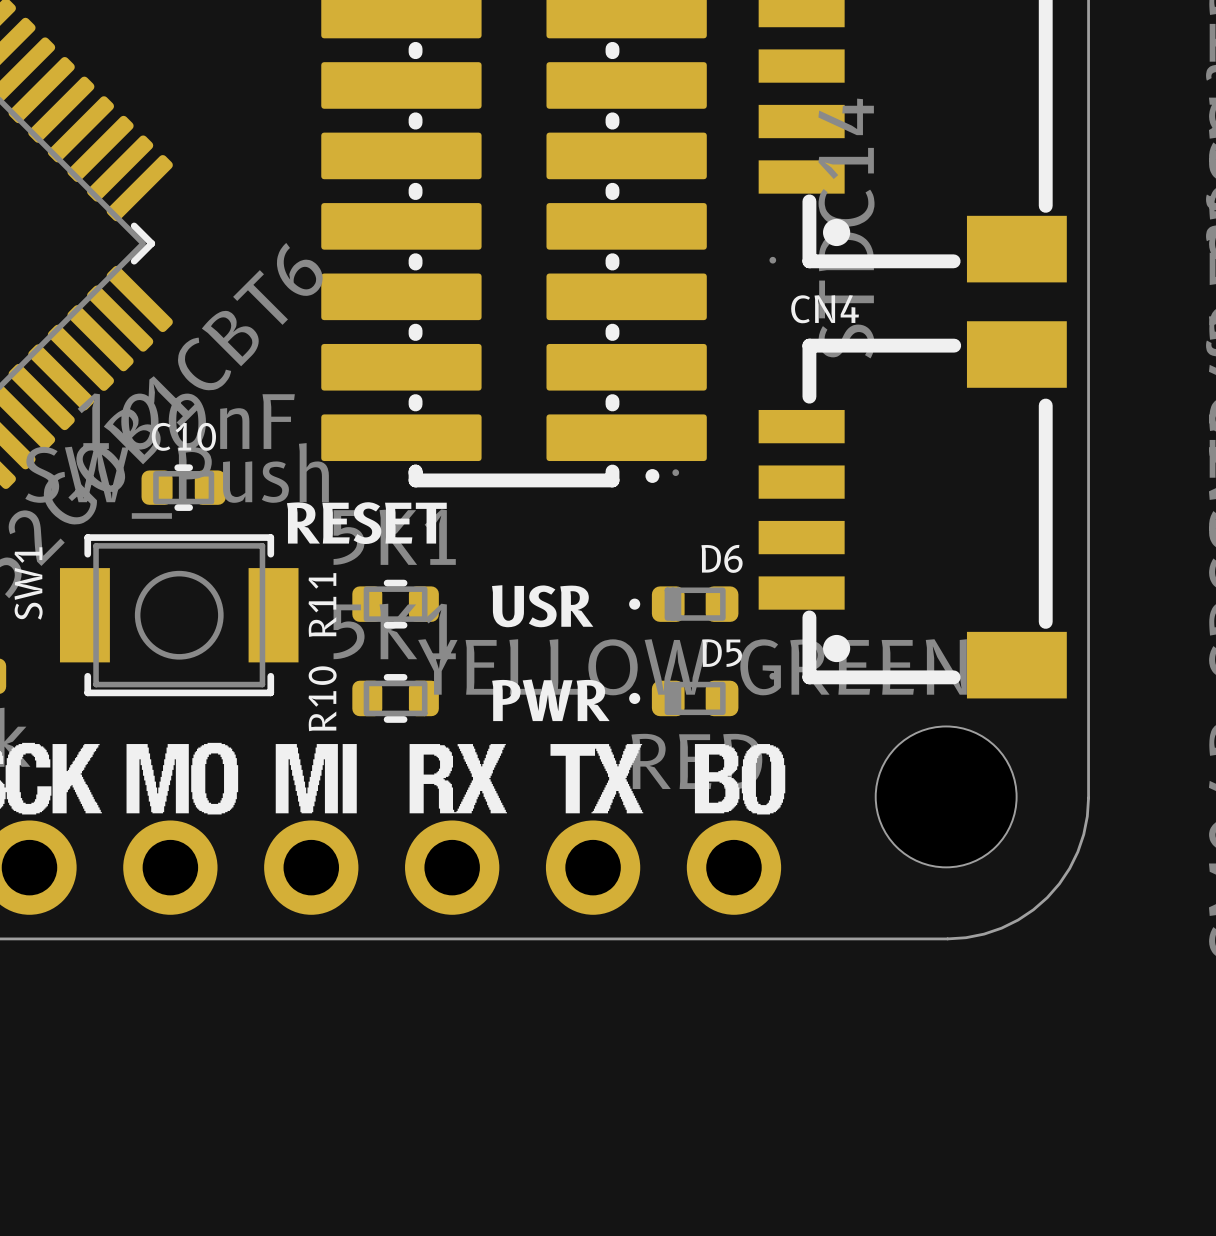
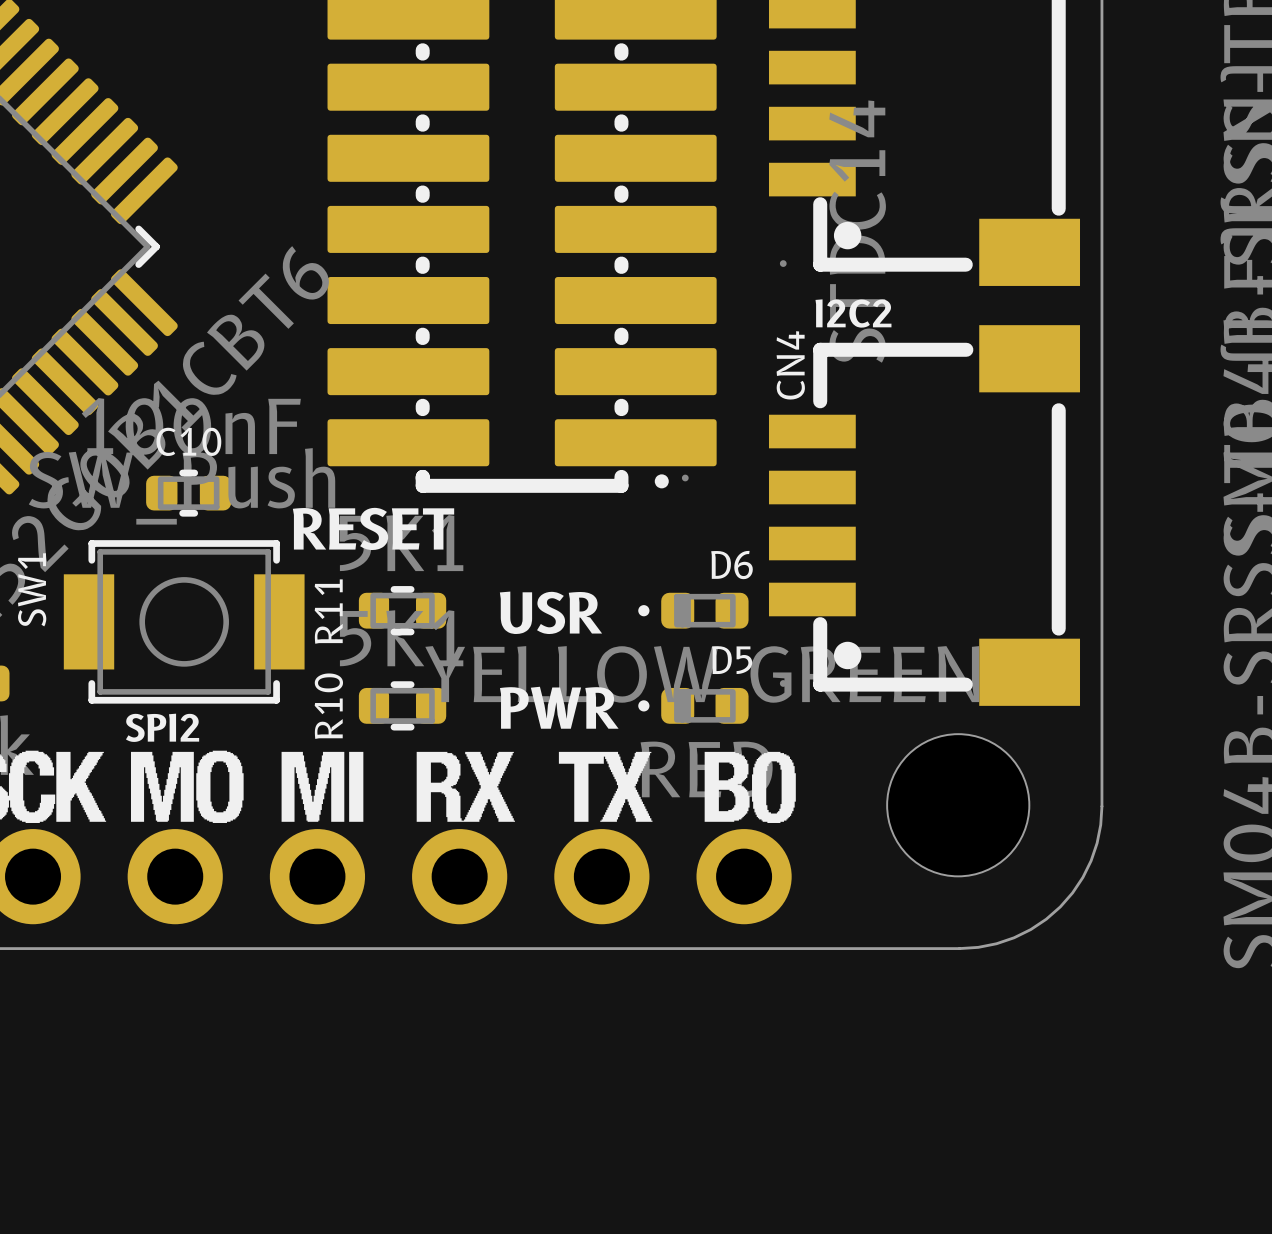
CN4 name rotation: 0° (825, 309) -> 90° counterclockwise (790, 365)
text: none -> I2C2 (853, 313)
text: none -> SPI2 (162, 727)

